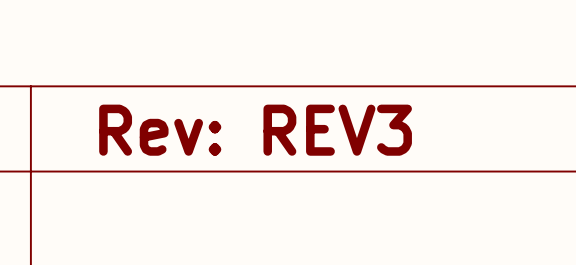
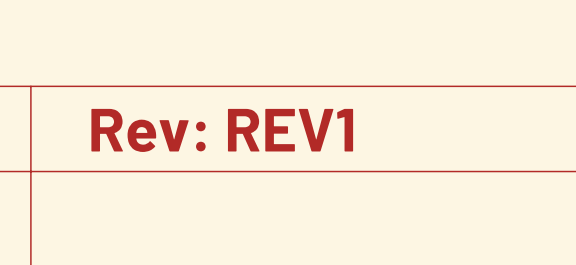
title block: Rev: REV3 (255, 130) -> Rev: REV1 (222, 130)

